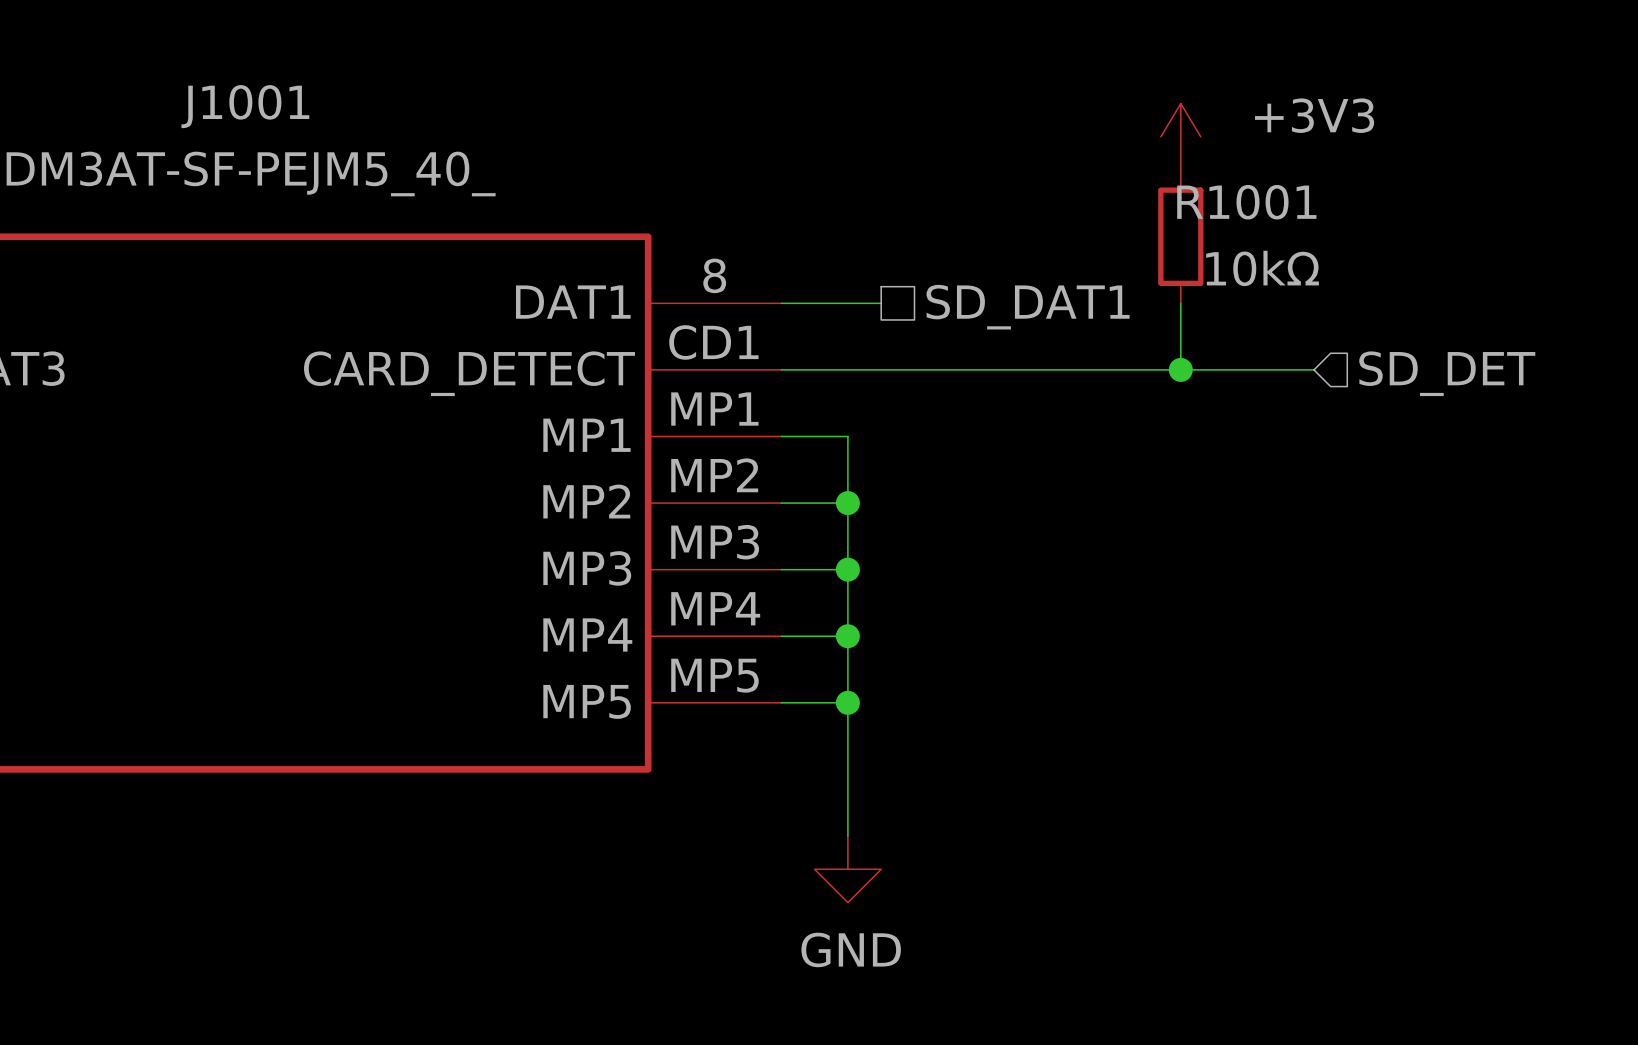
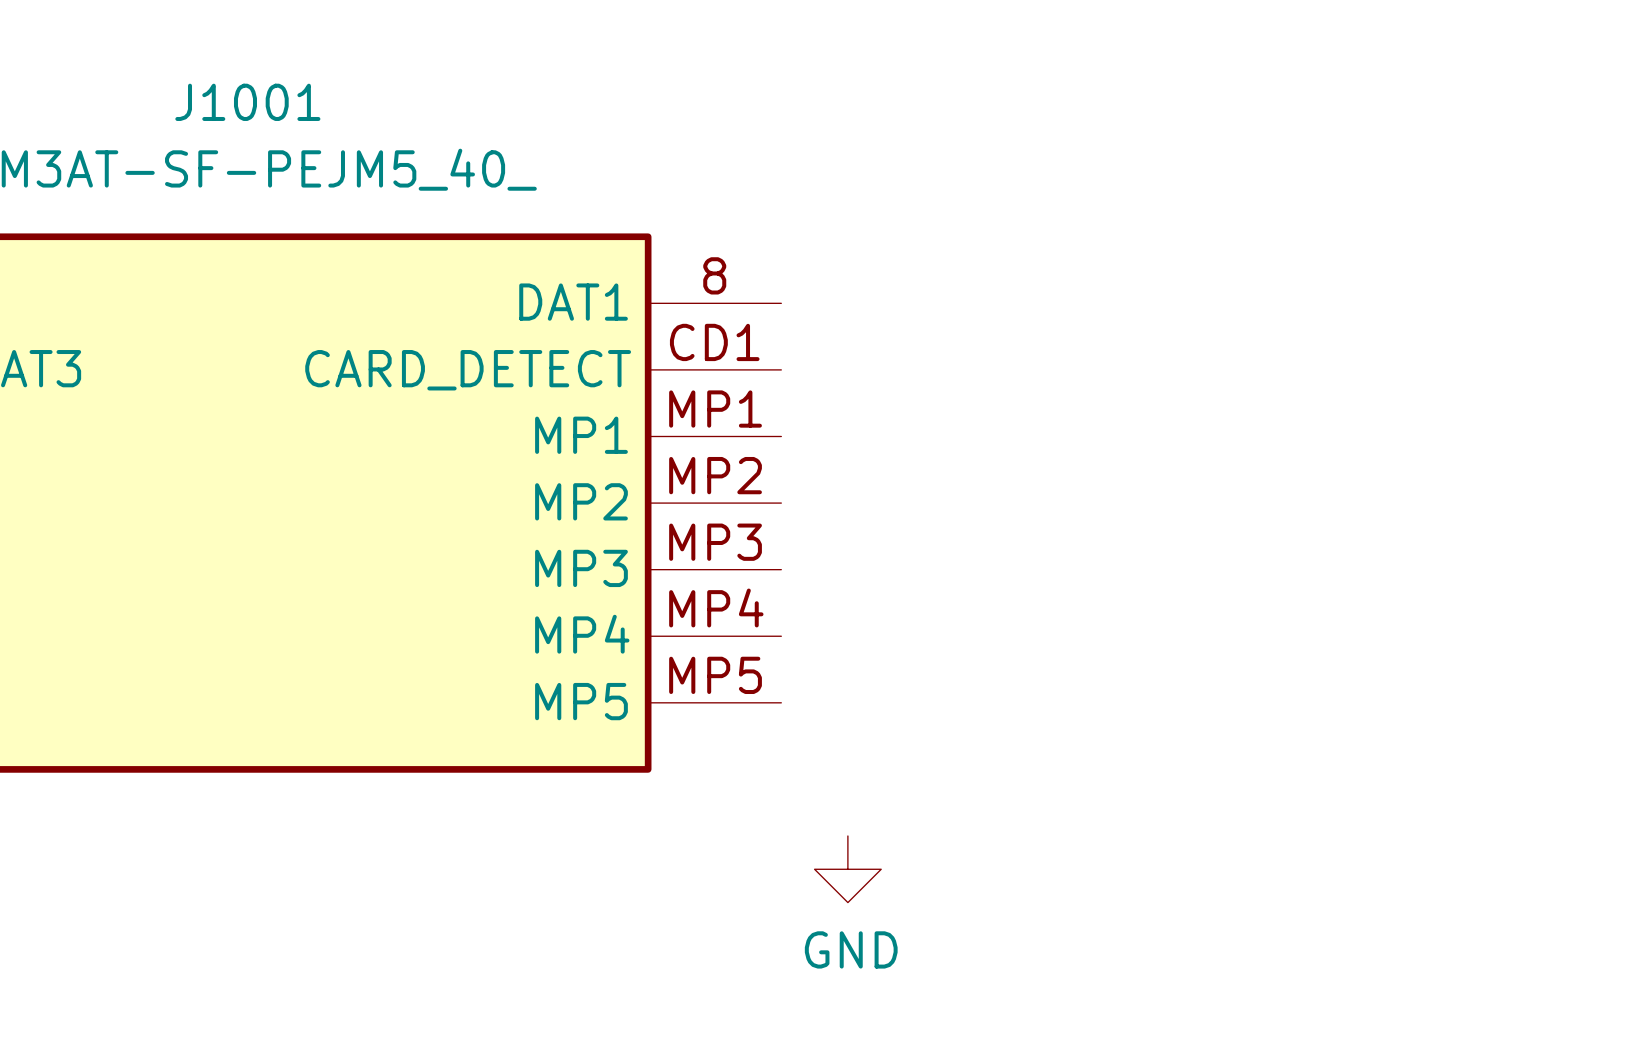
power symbol: +3V3 (1180, 136) -> none
R1001: 10kΩ (1180, 236) -> none
wire: (781, 303) (881, 303) -> none
wire: (1180, 303) (1180, 369) -> none
hierarchical label: SD_DAT1 (1028, 307) -> none
wire: (781, 369) (1313, 369) -> none
junction: (1180, 369) -> none
hierarchical label: SD_DET (1447, 373) -> none
wire: (781, 436) (847, 436) (847, 835) -> none
wire: (781, 503) (847, 503) -> none
junction: (847, 503) -> none
wire: (781, 569) (847, 569) -> none
junction: (847, 569) -> none
wire: (781, 636) (847, 636) -> none
junction: (847, 636) -> none
wire: (781, 702) (847, 702) -> none
junction: (847, 702) -> none

